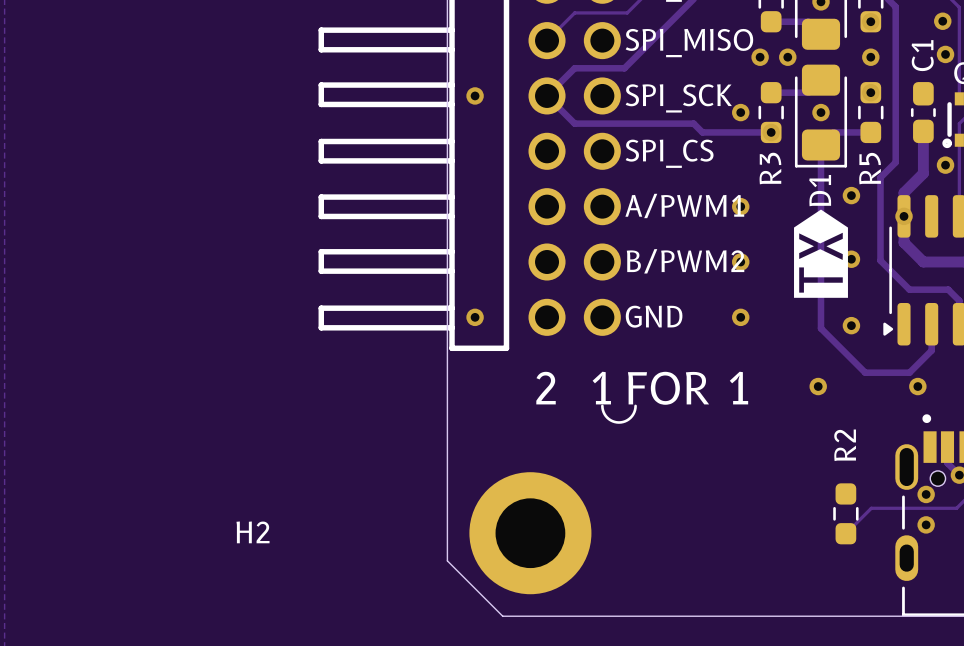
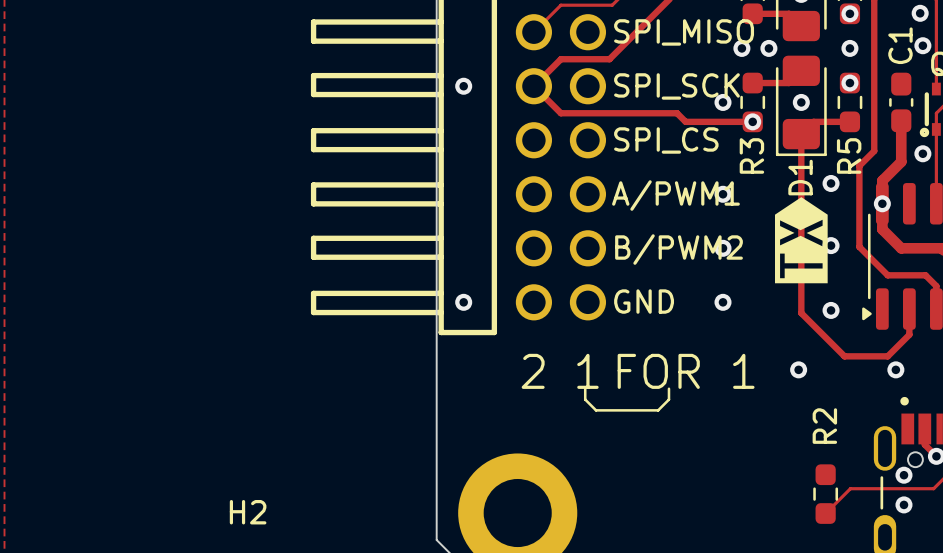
line: none -> (585, 388) (585, 399) (596, 410) (658, 410) (668, 399) (668, 388)
line: (602, 405) (607, 417) (618, 422) (630, 417) (635, 405) -> none

